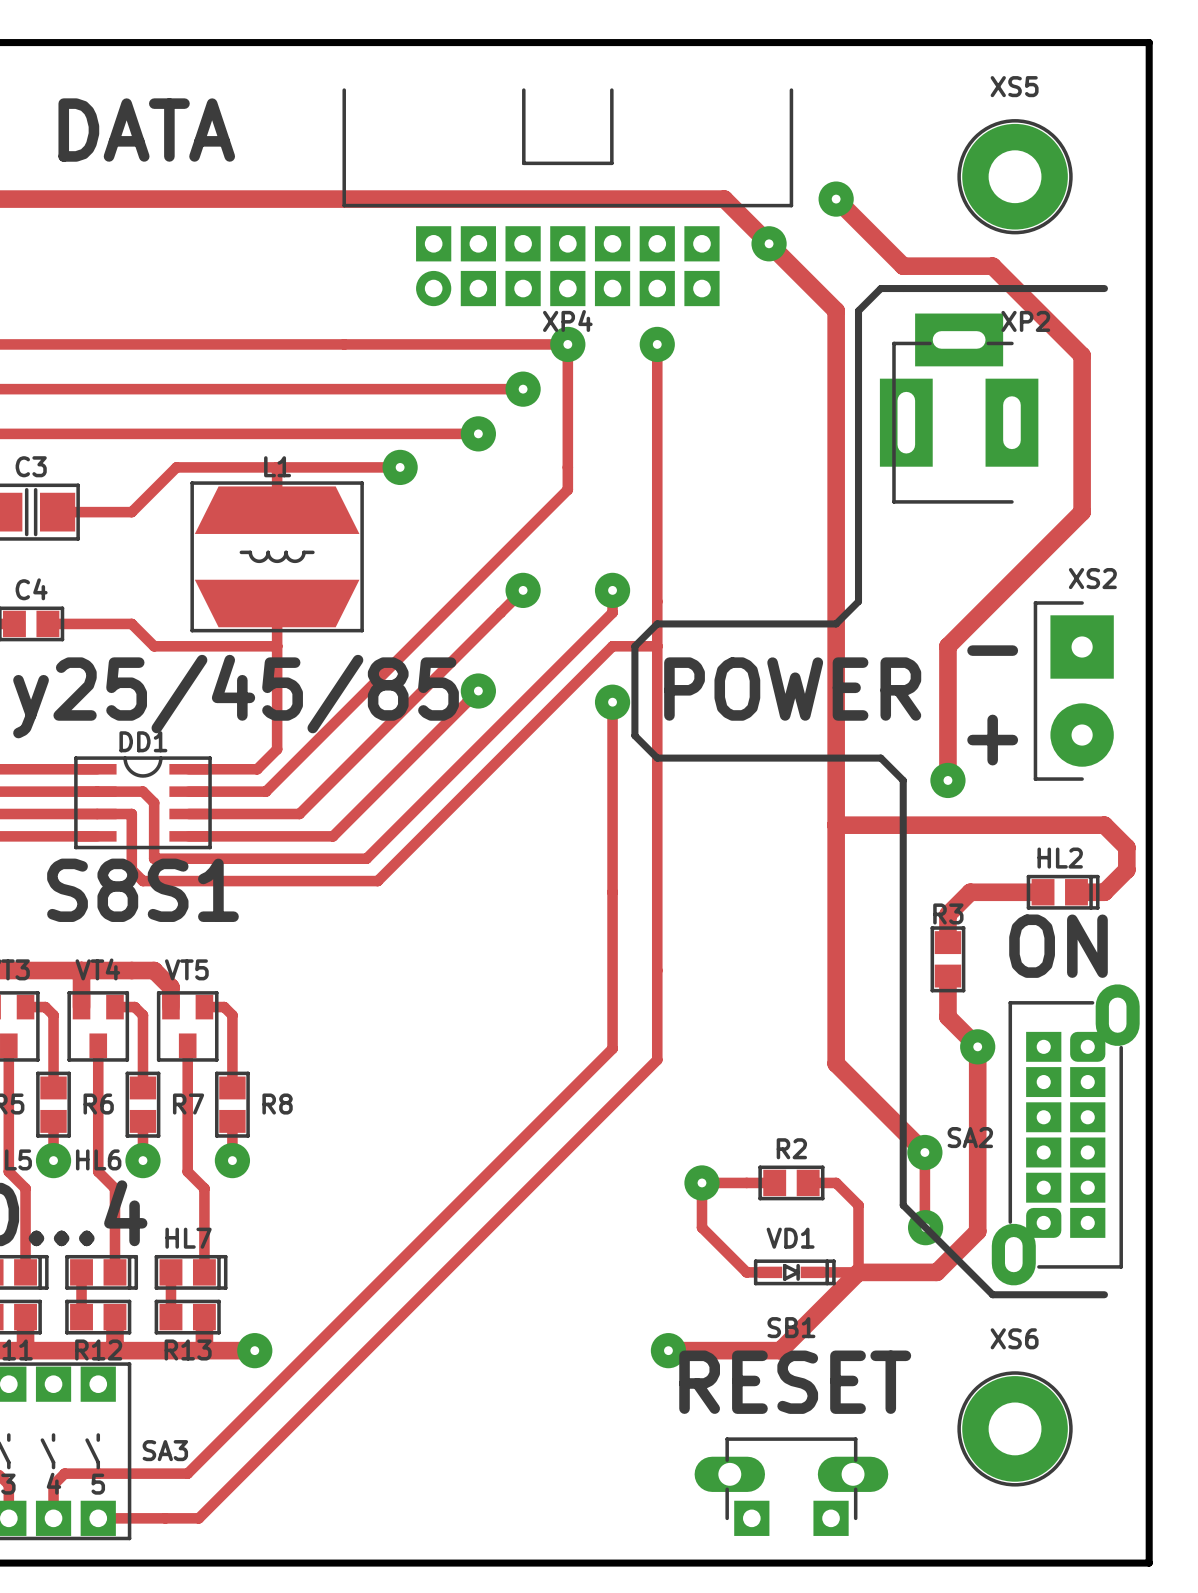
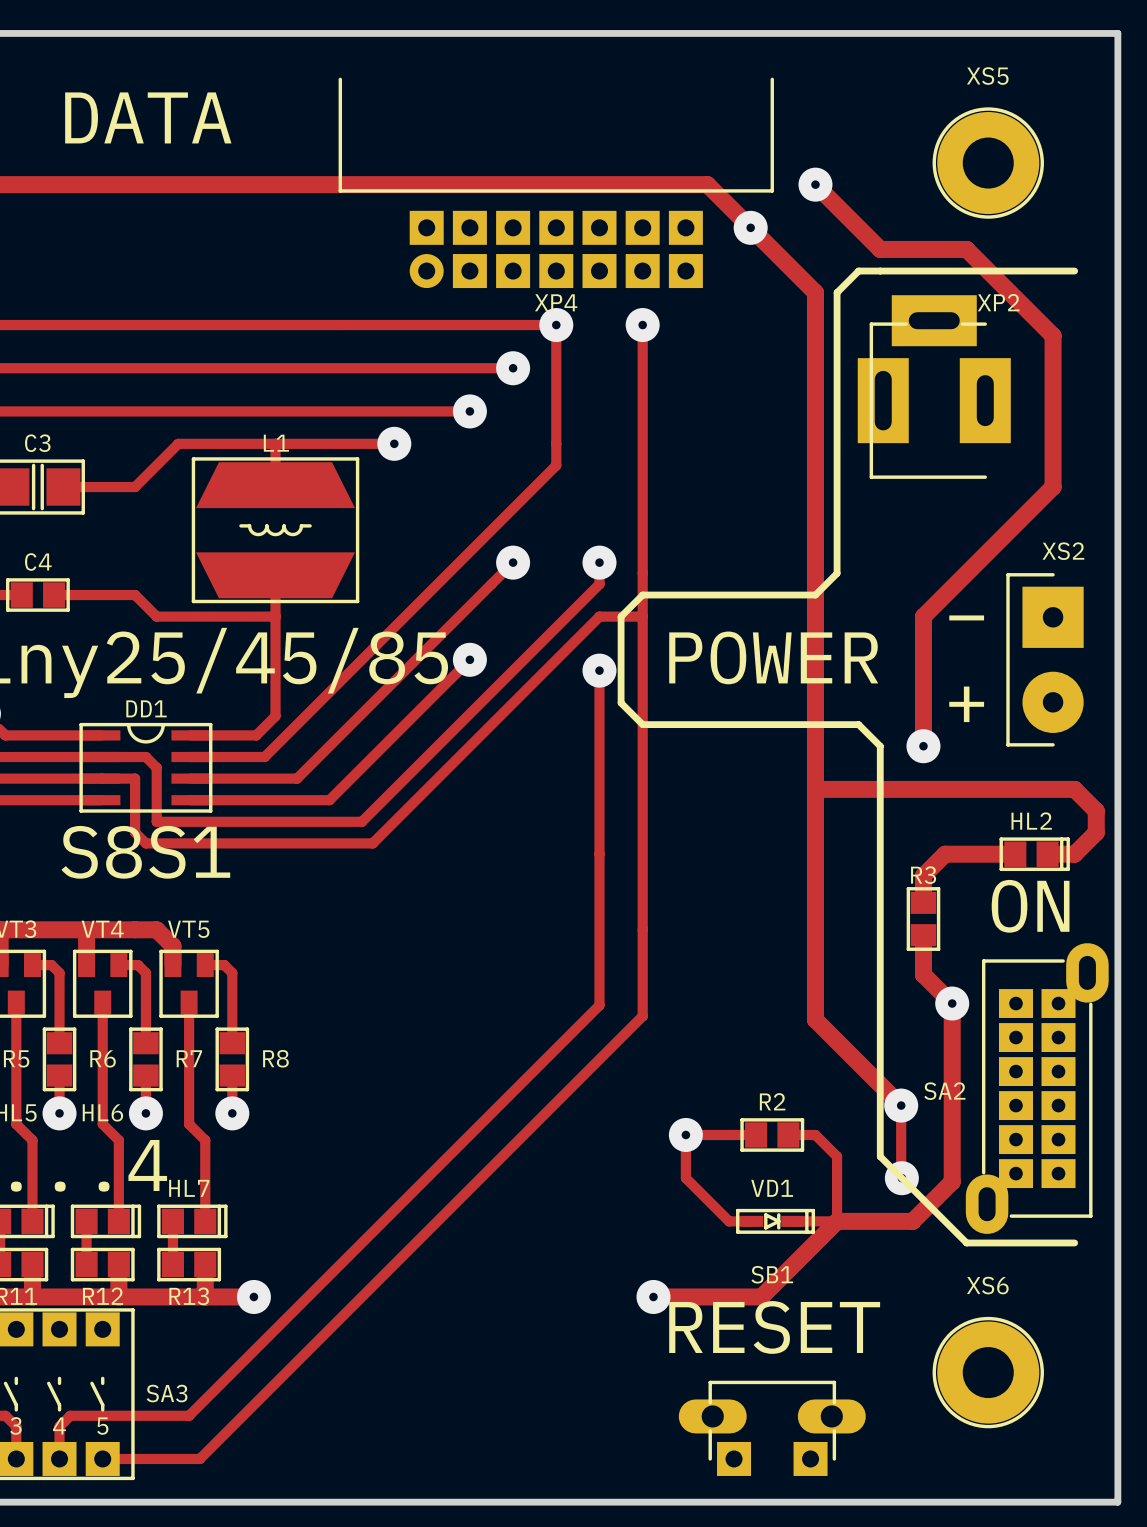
XP4 footprint: [342, 88, 794, 307] -> [338, 77, 774, 289]
SA2 footprint: [991, 984, 1140, 1286] -> [965, 943, 1109, 1234]

